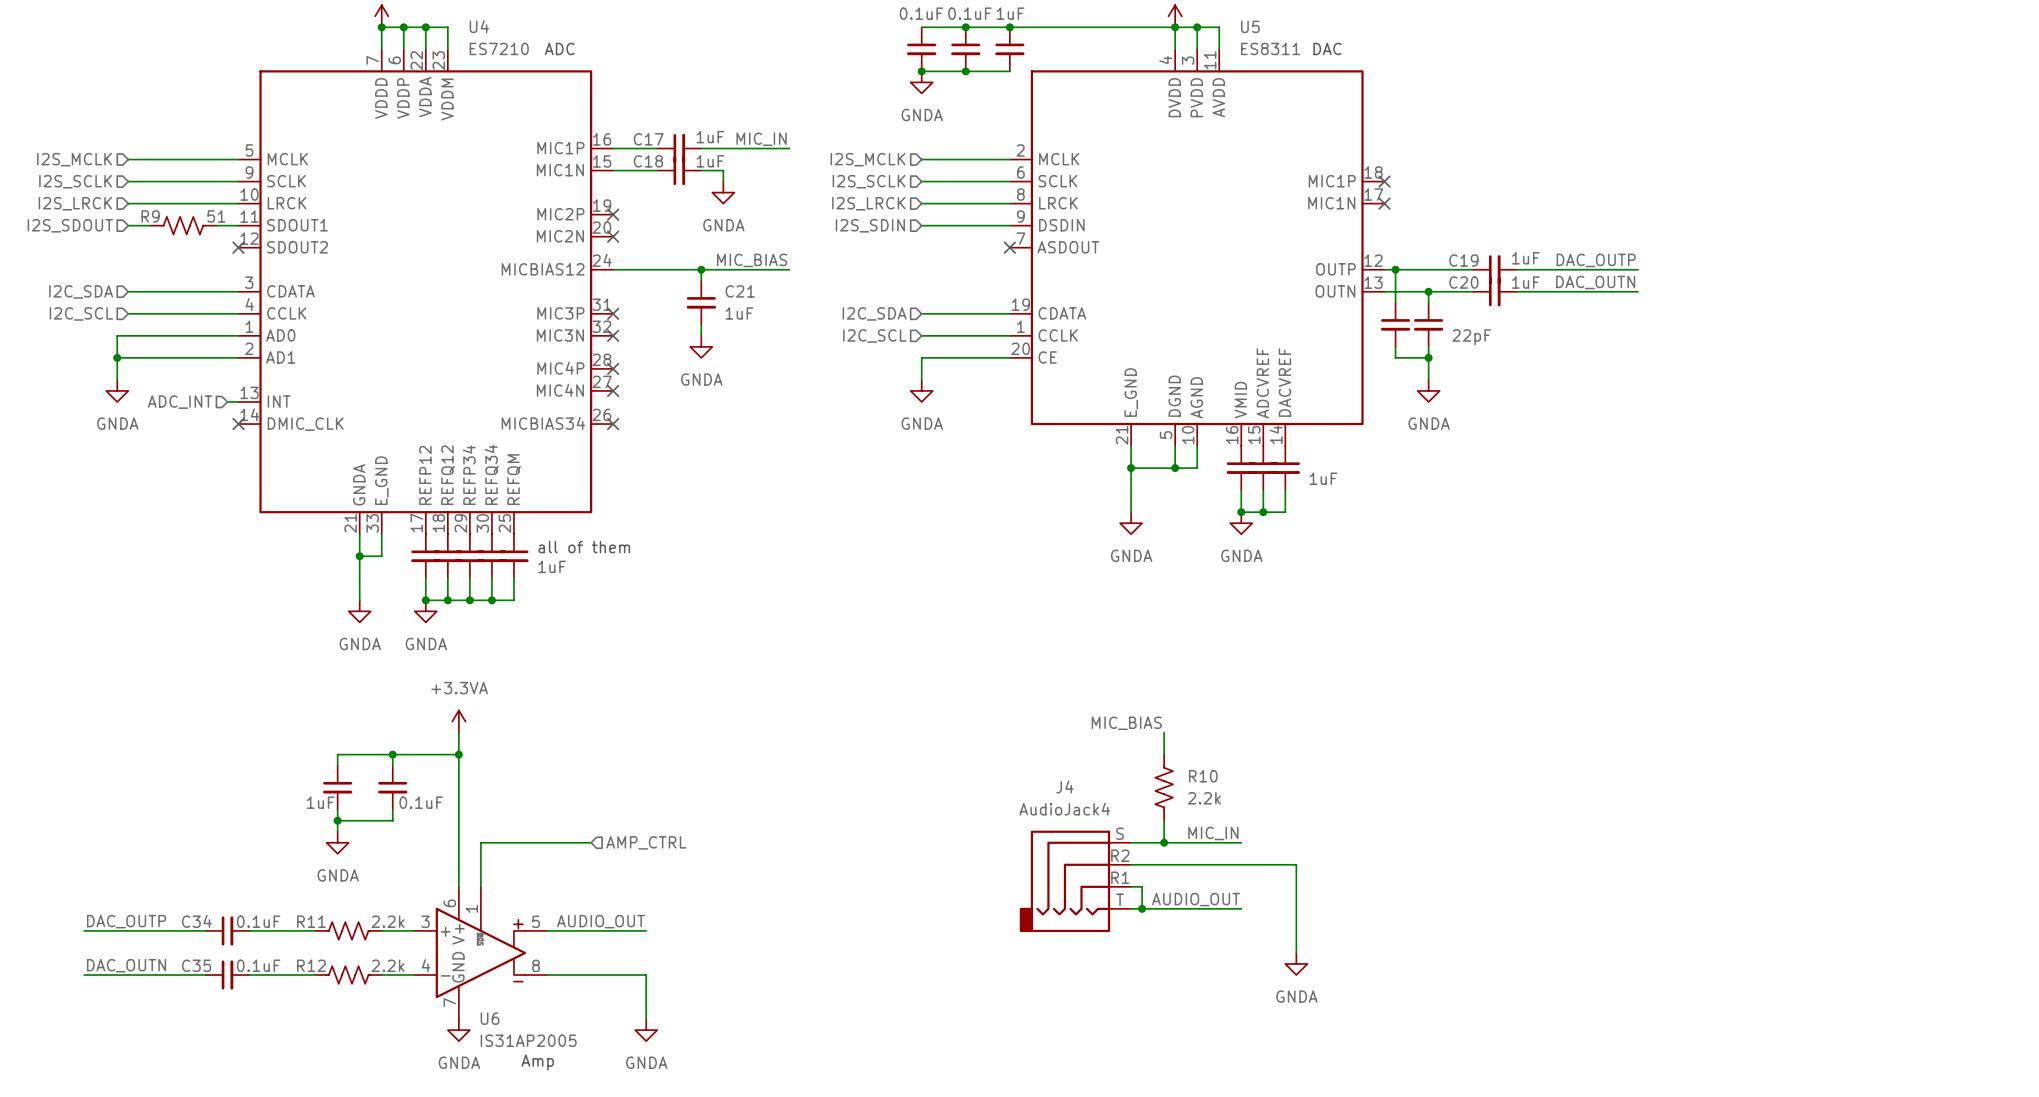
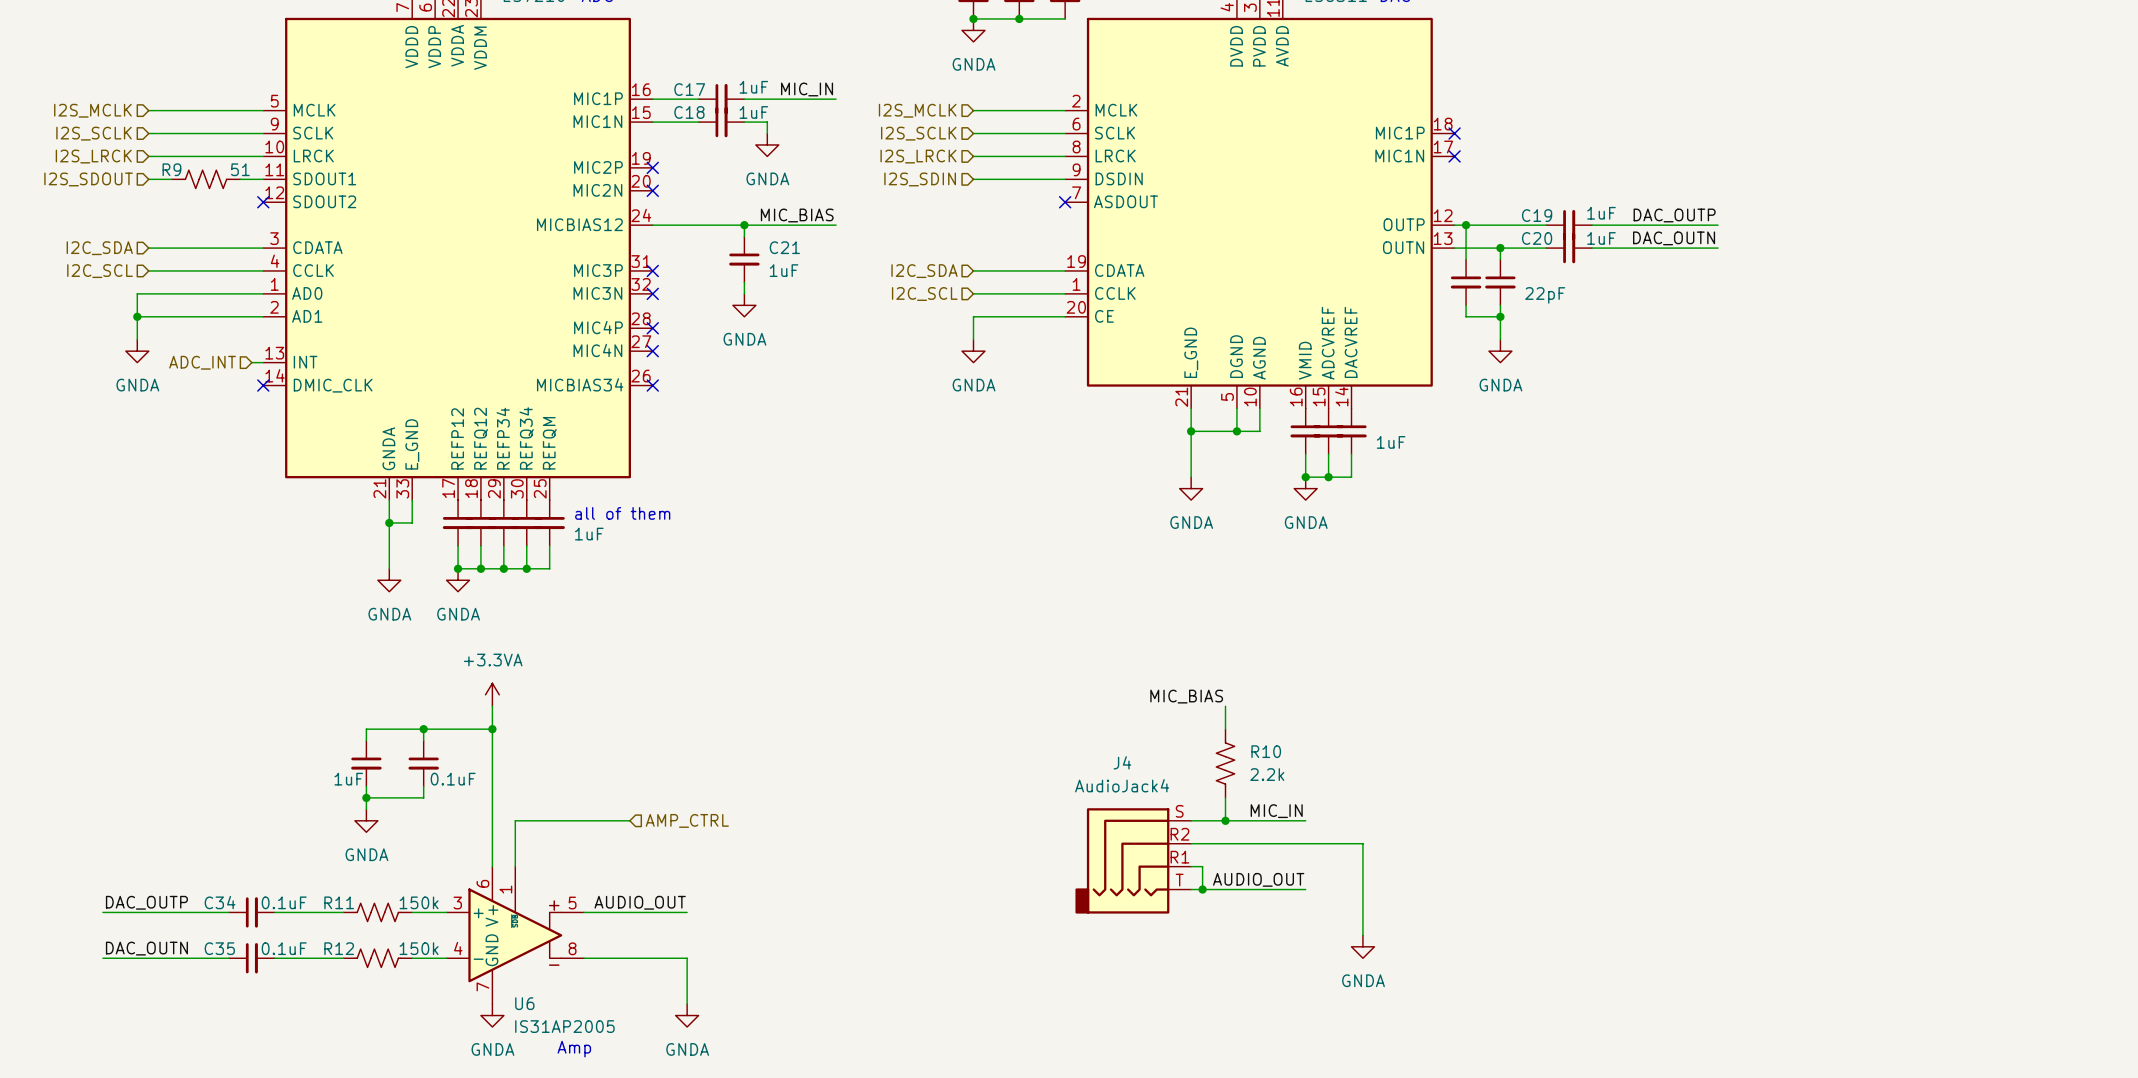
R11 value: 2.2k (388, 921) -> 150k (419, 902)
R12 value: 2.2k (388, 965) -> 150k (419, 948)

